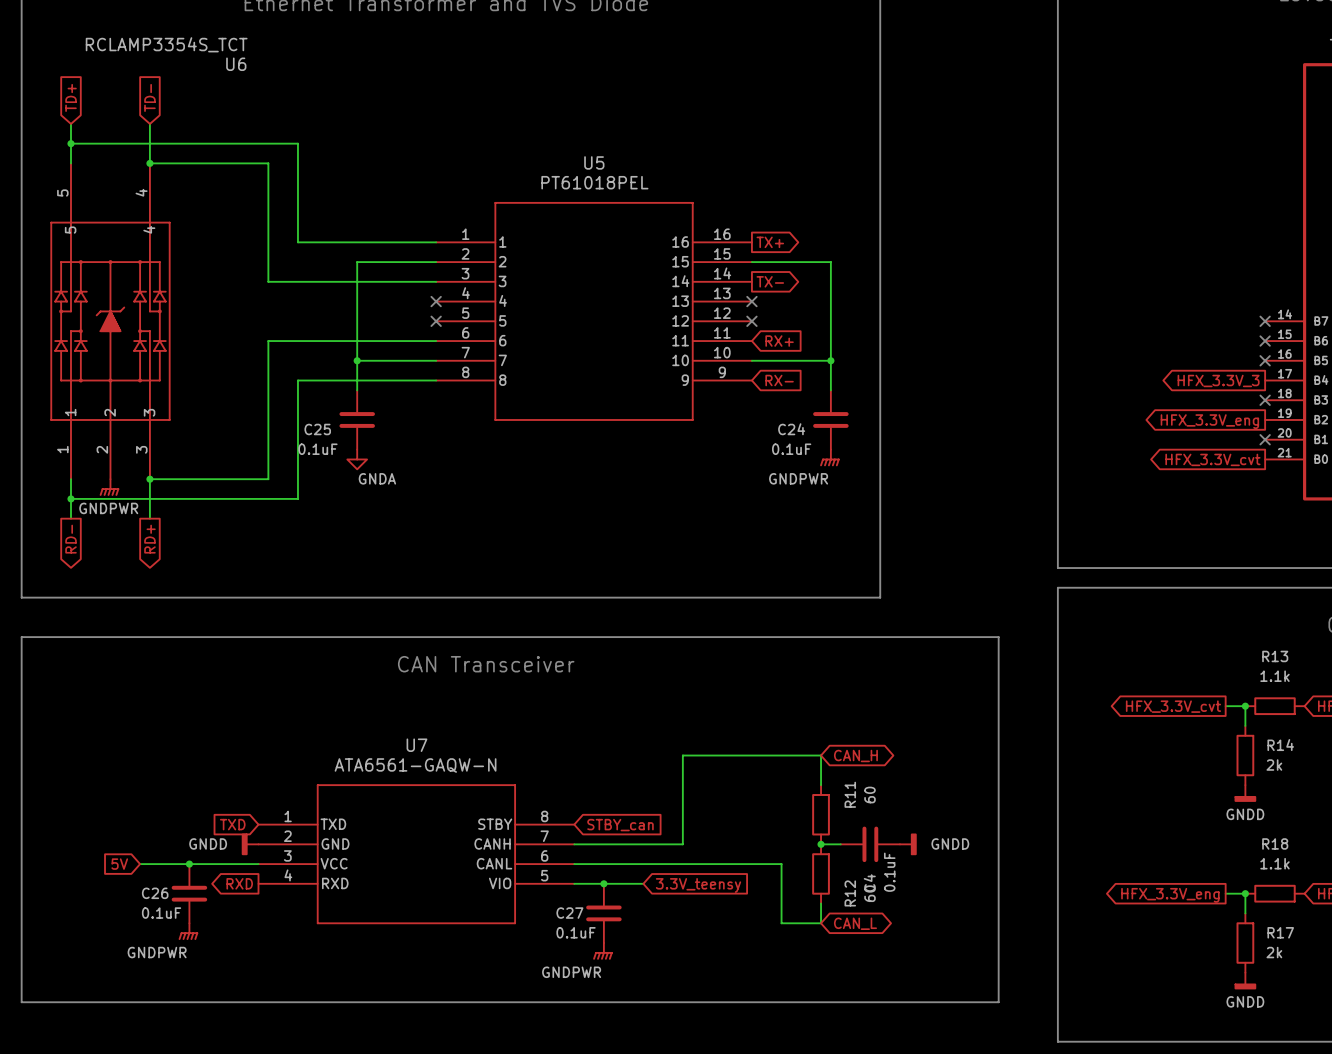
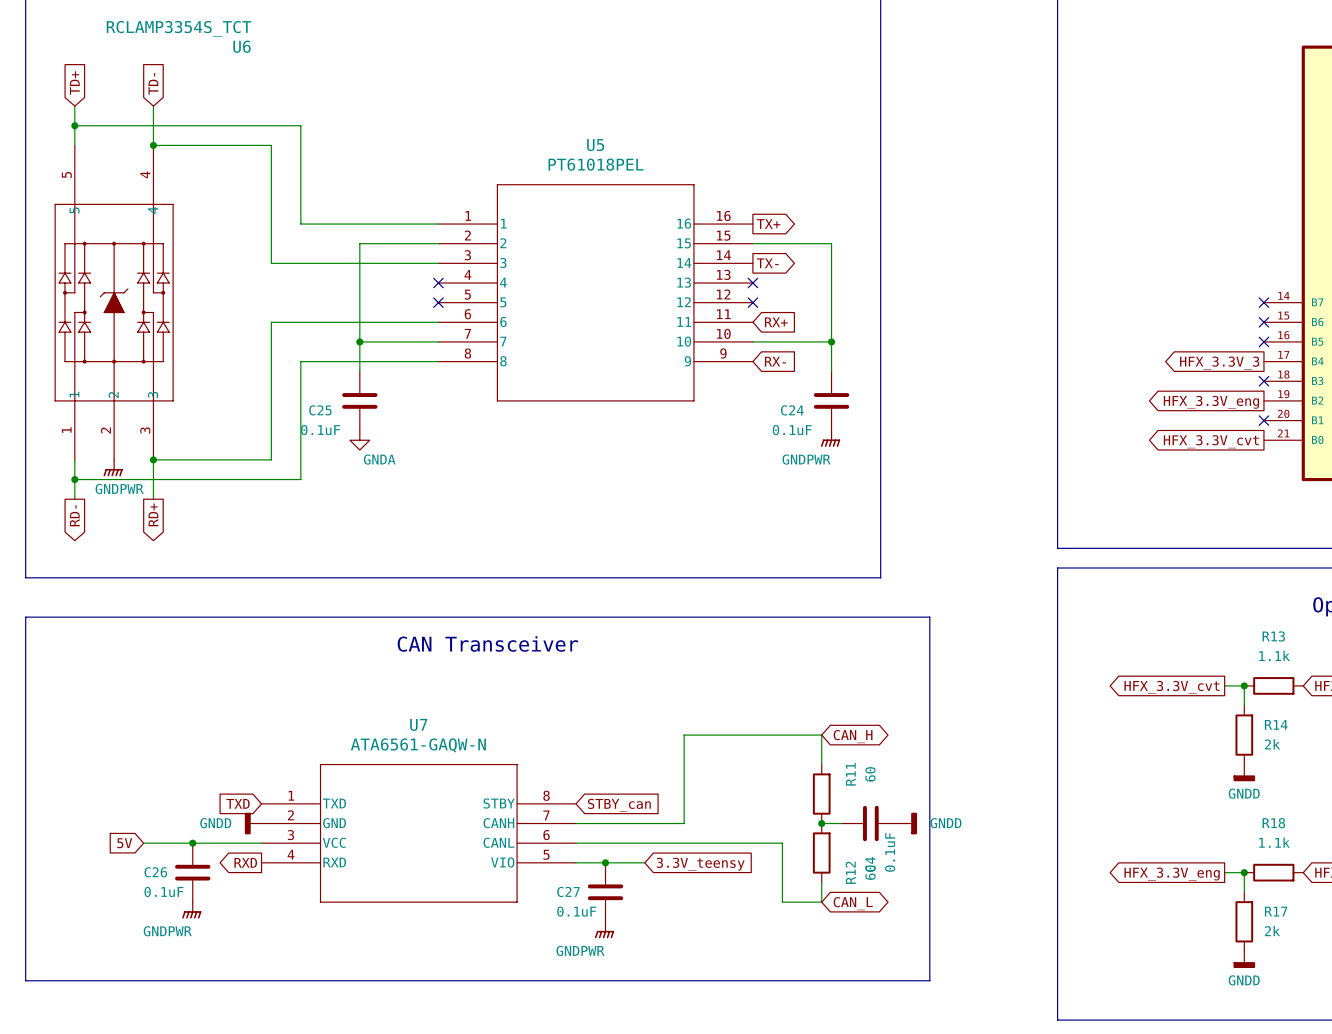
line: (929, 637) (998, 637) (998, 1002) (929, 1002) -> (929, 617) (929, 980)

